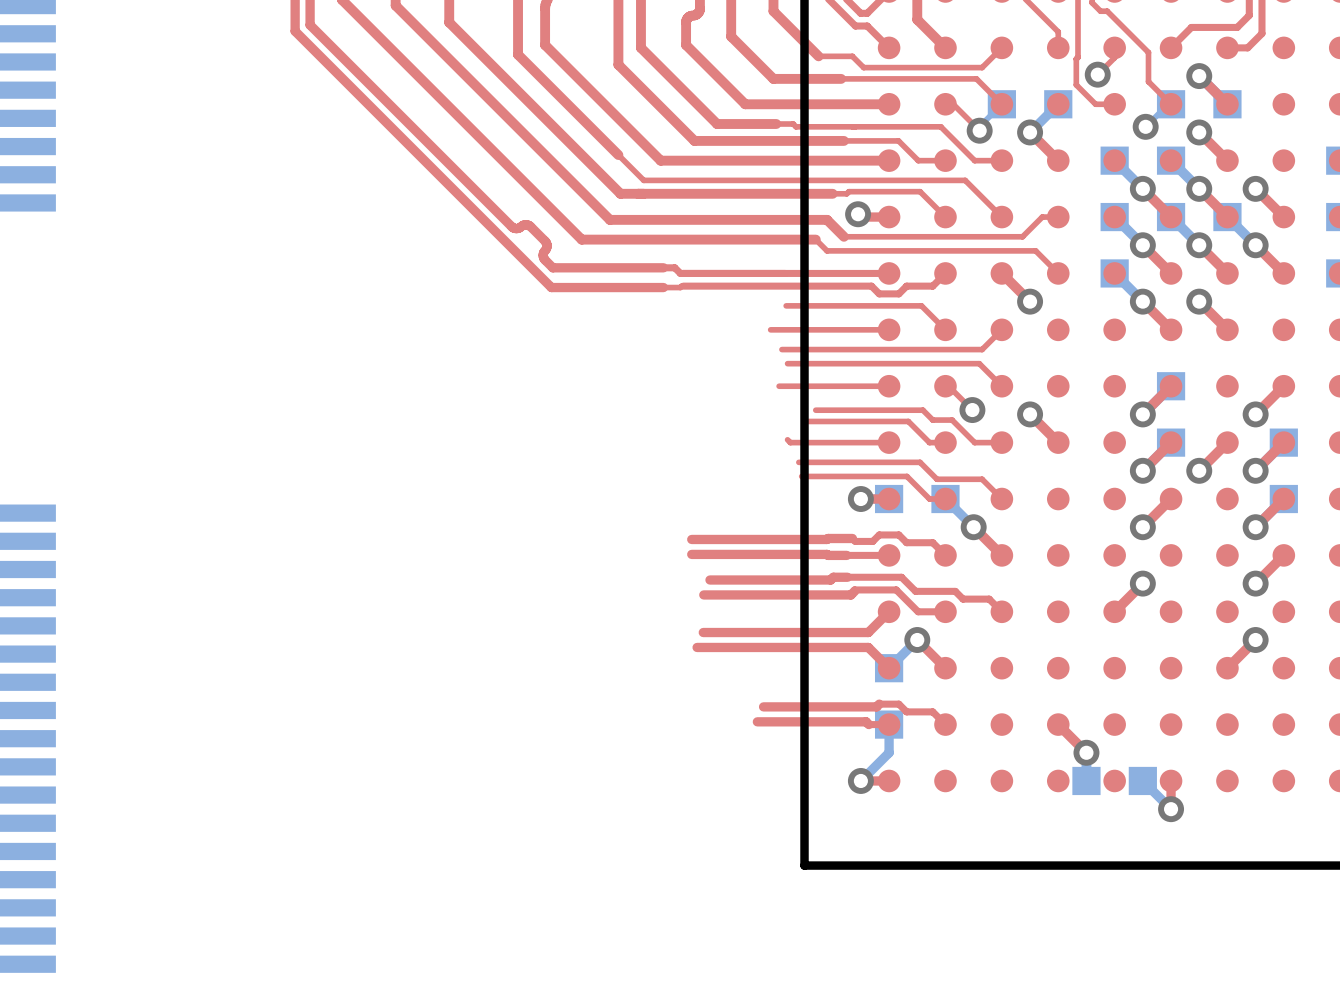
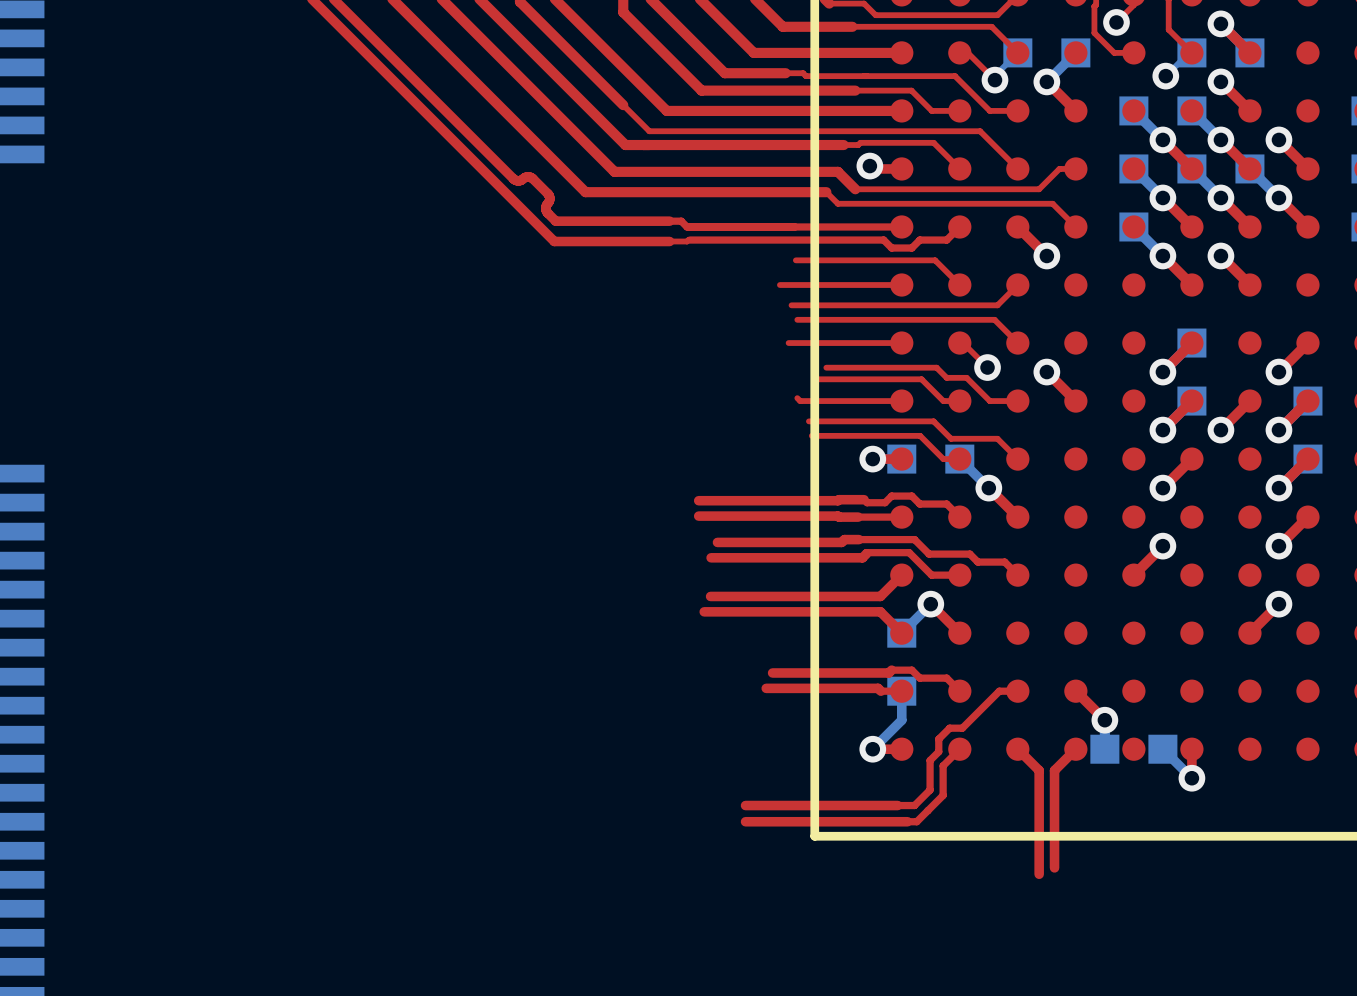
top track: none -> (1017, 691) (999, 691) (962, 728) (949, 728) (938, 739) (938, 751) (930, 760) (930, 790) (914, 805) (745, 805)
top track: none -> (959, 749) (943, 765) (943, 795) (916, 821) (745, 821)
top track: none -> (1017, 749) (1039, 770) (1039, 874)
top track: none -> (1075, 749) (1054, 770) (1054, 867)

